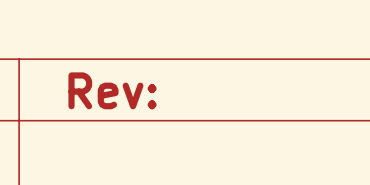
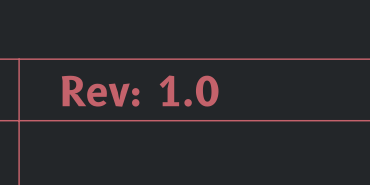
title block: Rev: (112, 90) -> Rev: 1.0 (140, 91)

